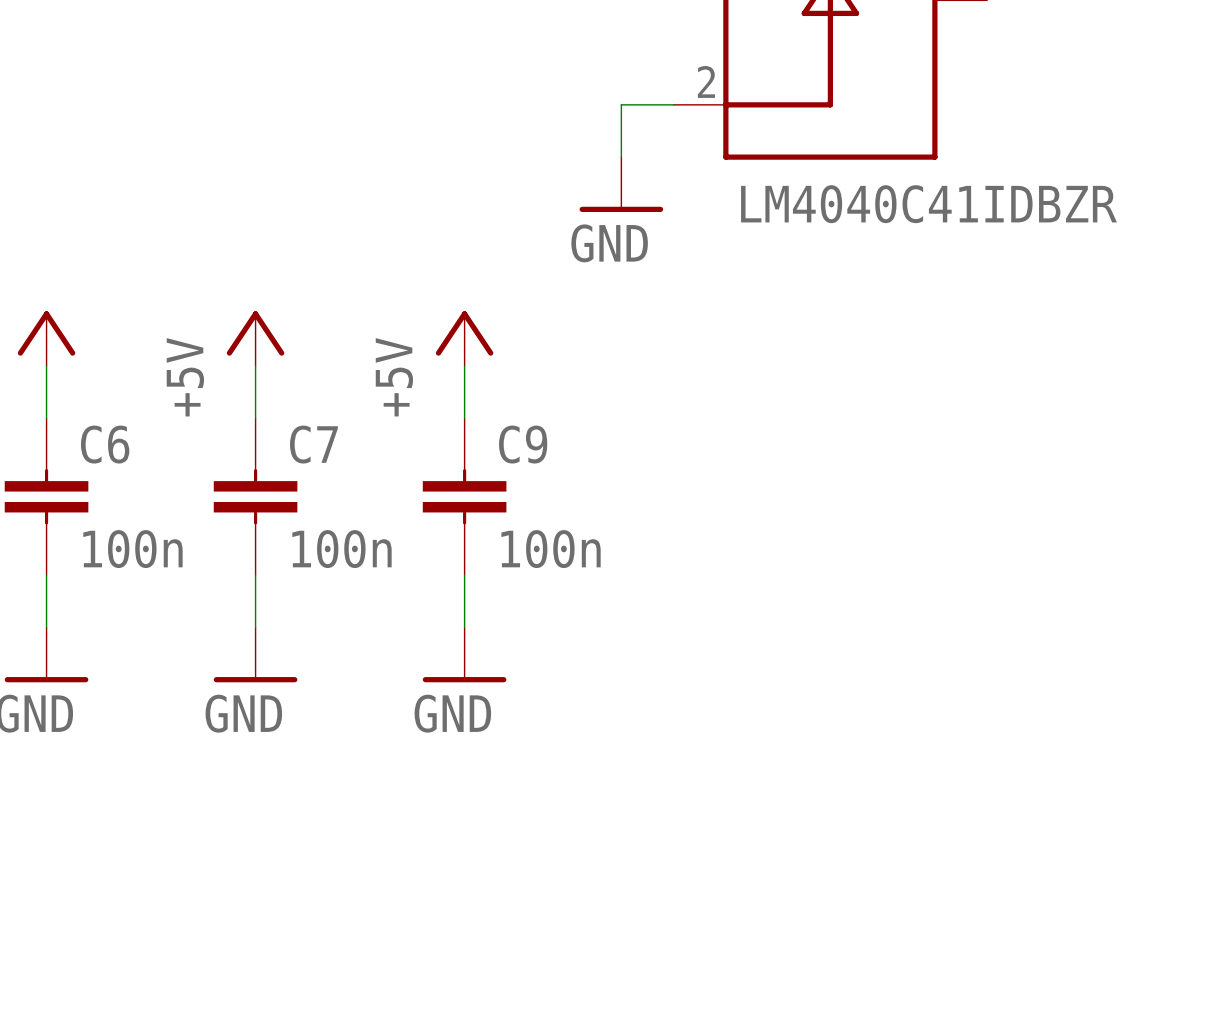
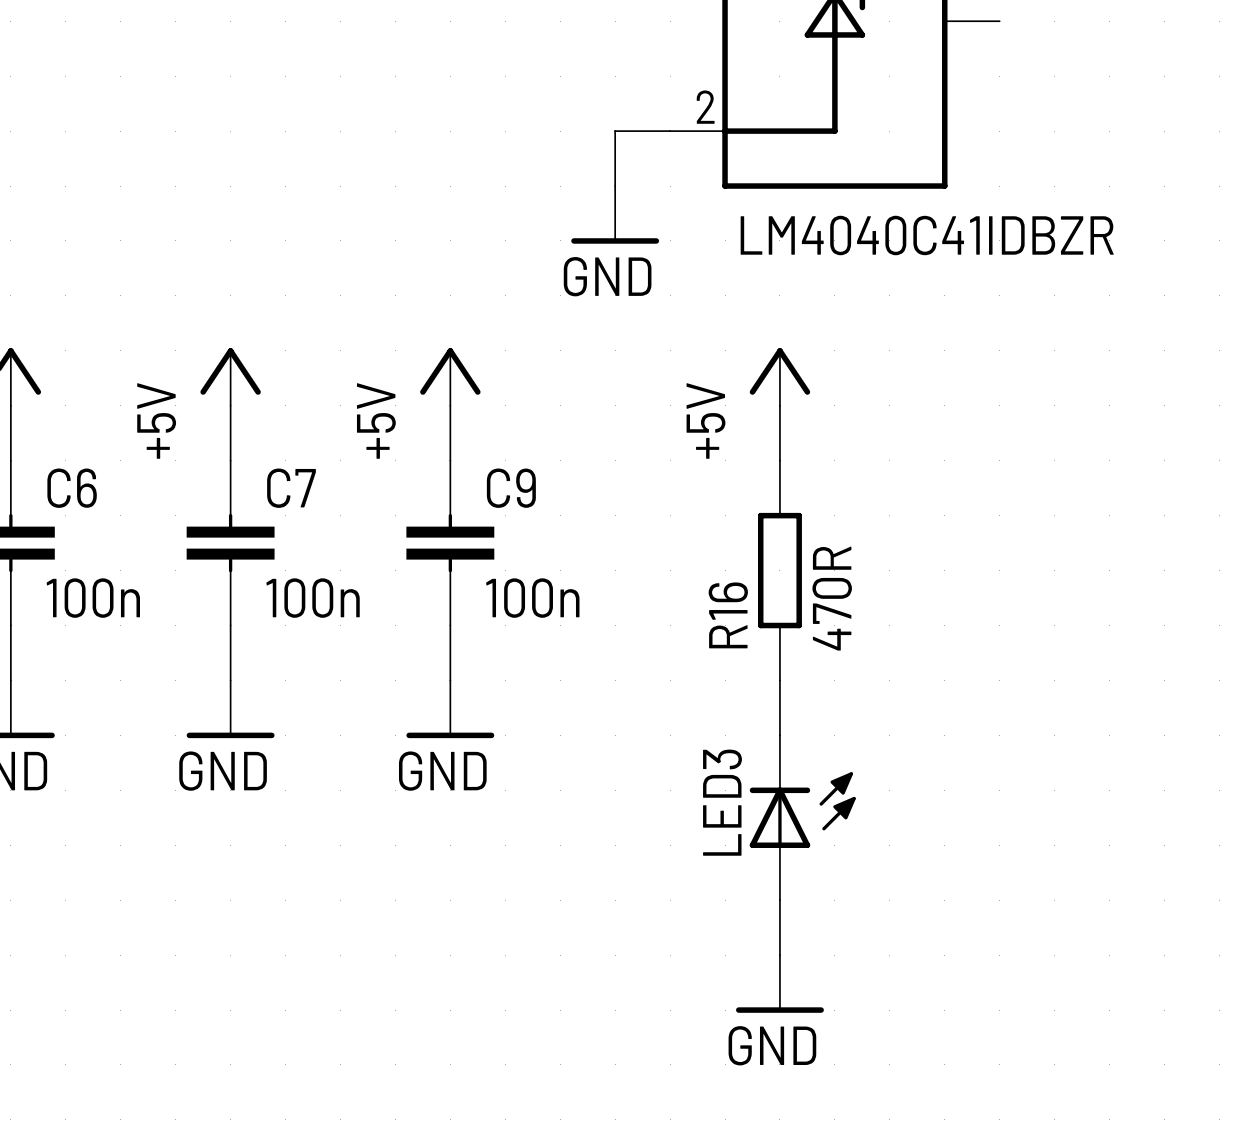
power symbol: none -> +5V (779, 376)
wire: none -> (779, 405) (779, 460)
R16: none -> 470R (779, 570)
wire: none -> (779, 680) (779, 735)
LED3: none -> (802, 817)
wire: none -> (779, 900) (779, 955)
power symbol: none -> GND (779, 983)

